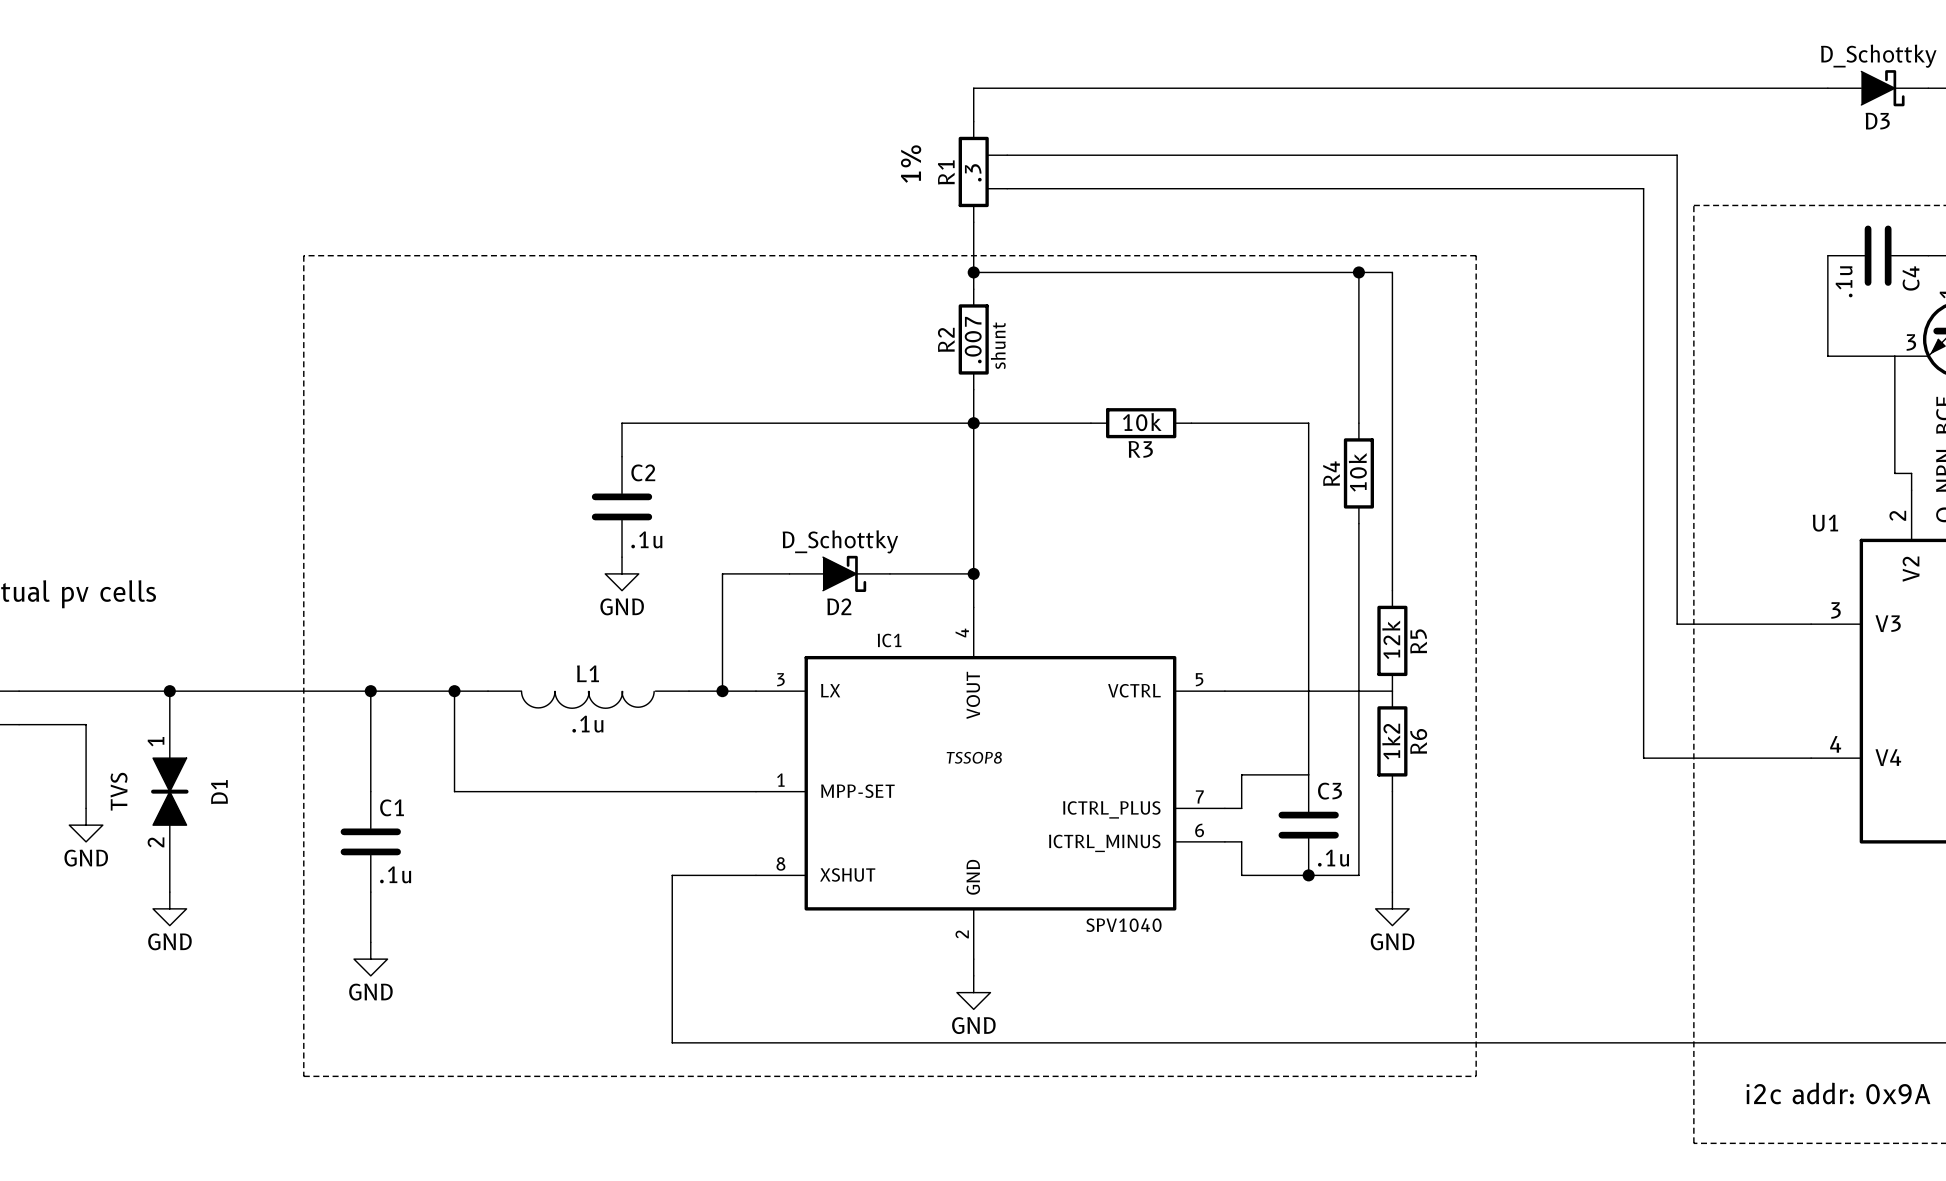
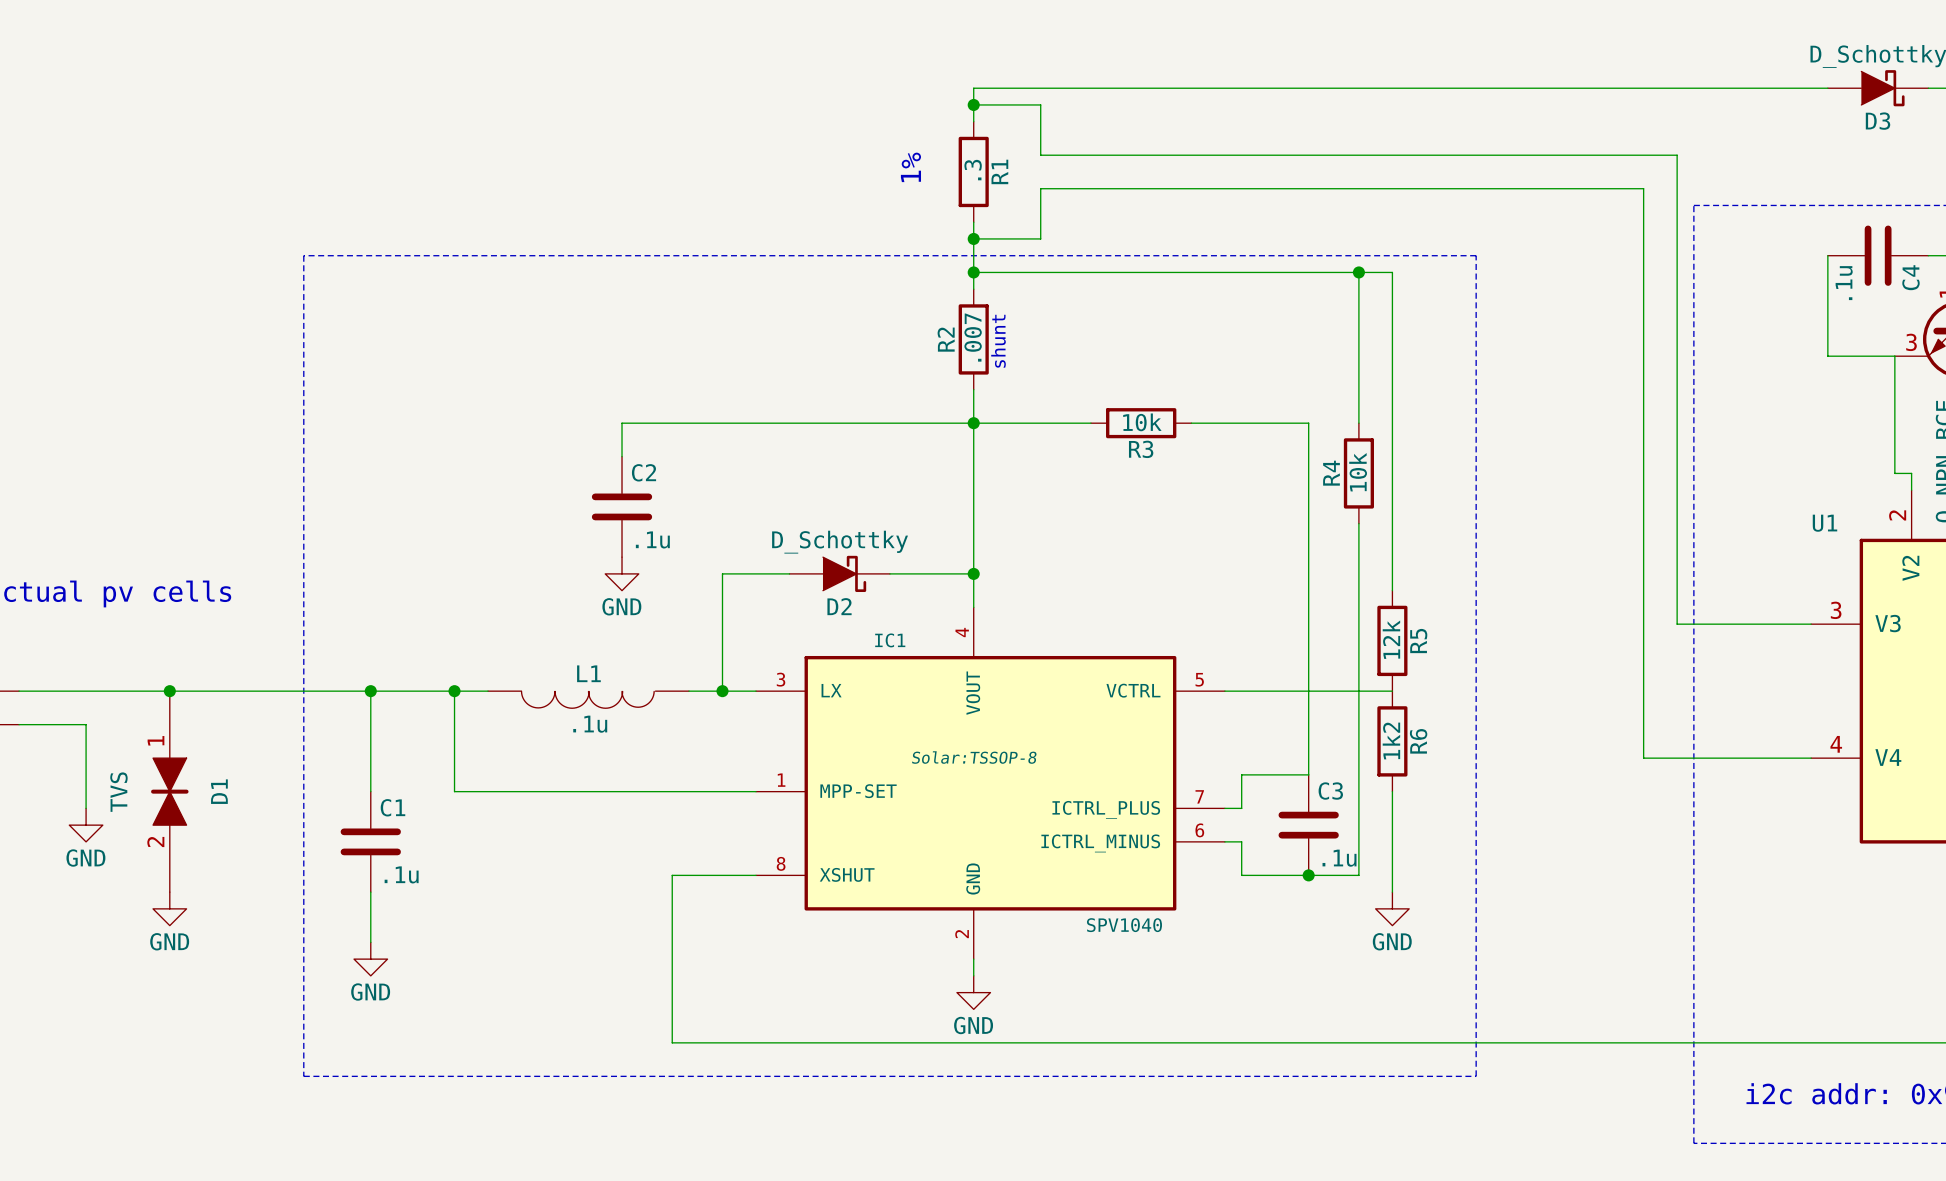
junction: none -> (973, 104)
R1 symbol: [958, 121, 1008, 223] -> [958, 121, 989, 223]
wire: (1007, 155) (1040, 155) -> (973, 104) (1040, 104) (1040, 155)
R1 name position: R1 (946, 172) -> R1 (999, 171)
wire: (1007, 188) (1040, 188) -> (973, 238) (1040, 238) (1040, 188)
junction: none -> (973, 238)
IC1 text: TSSOP8 (974, 757) -> Solar:TSSOP-8 (974, 757)

